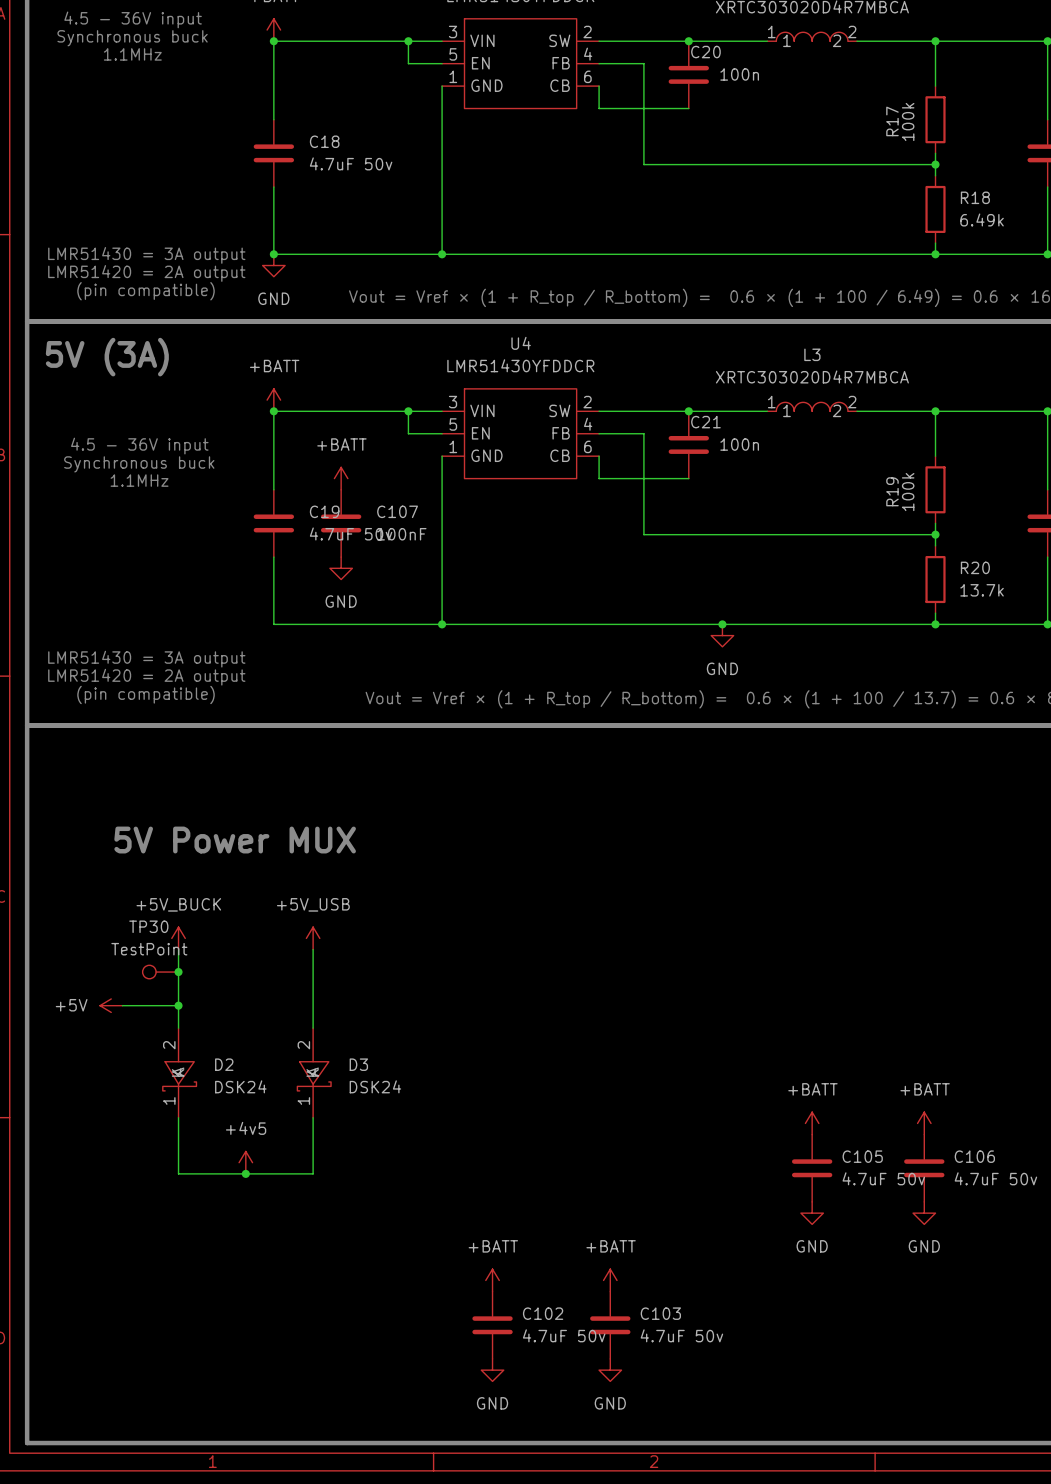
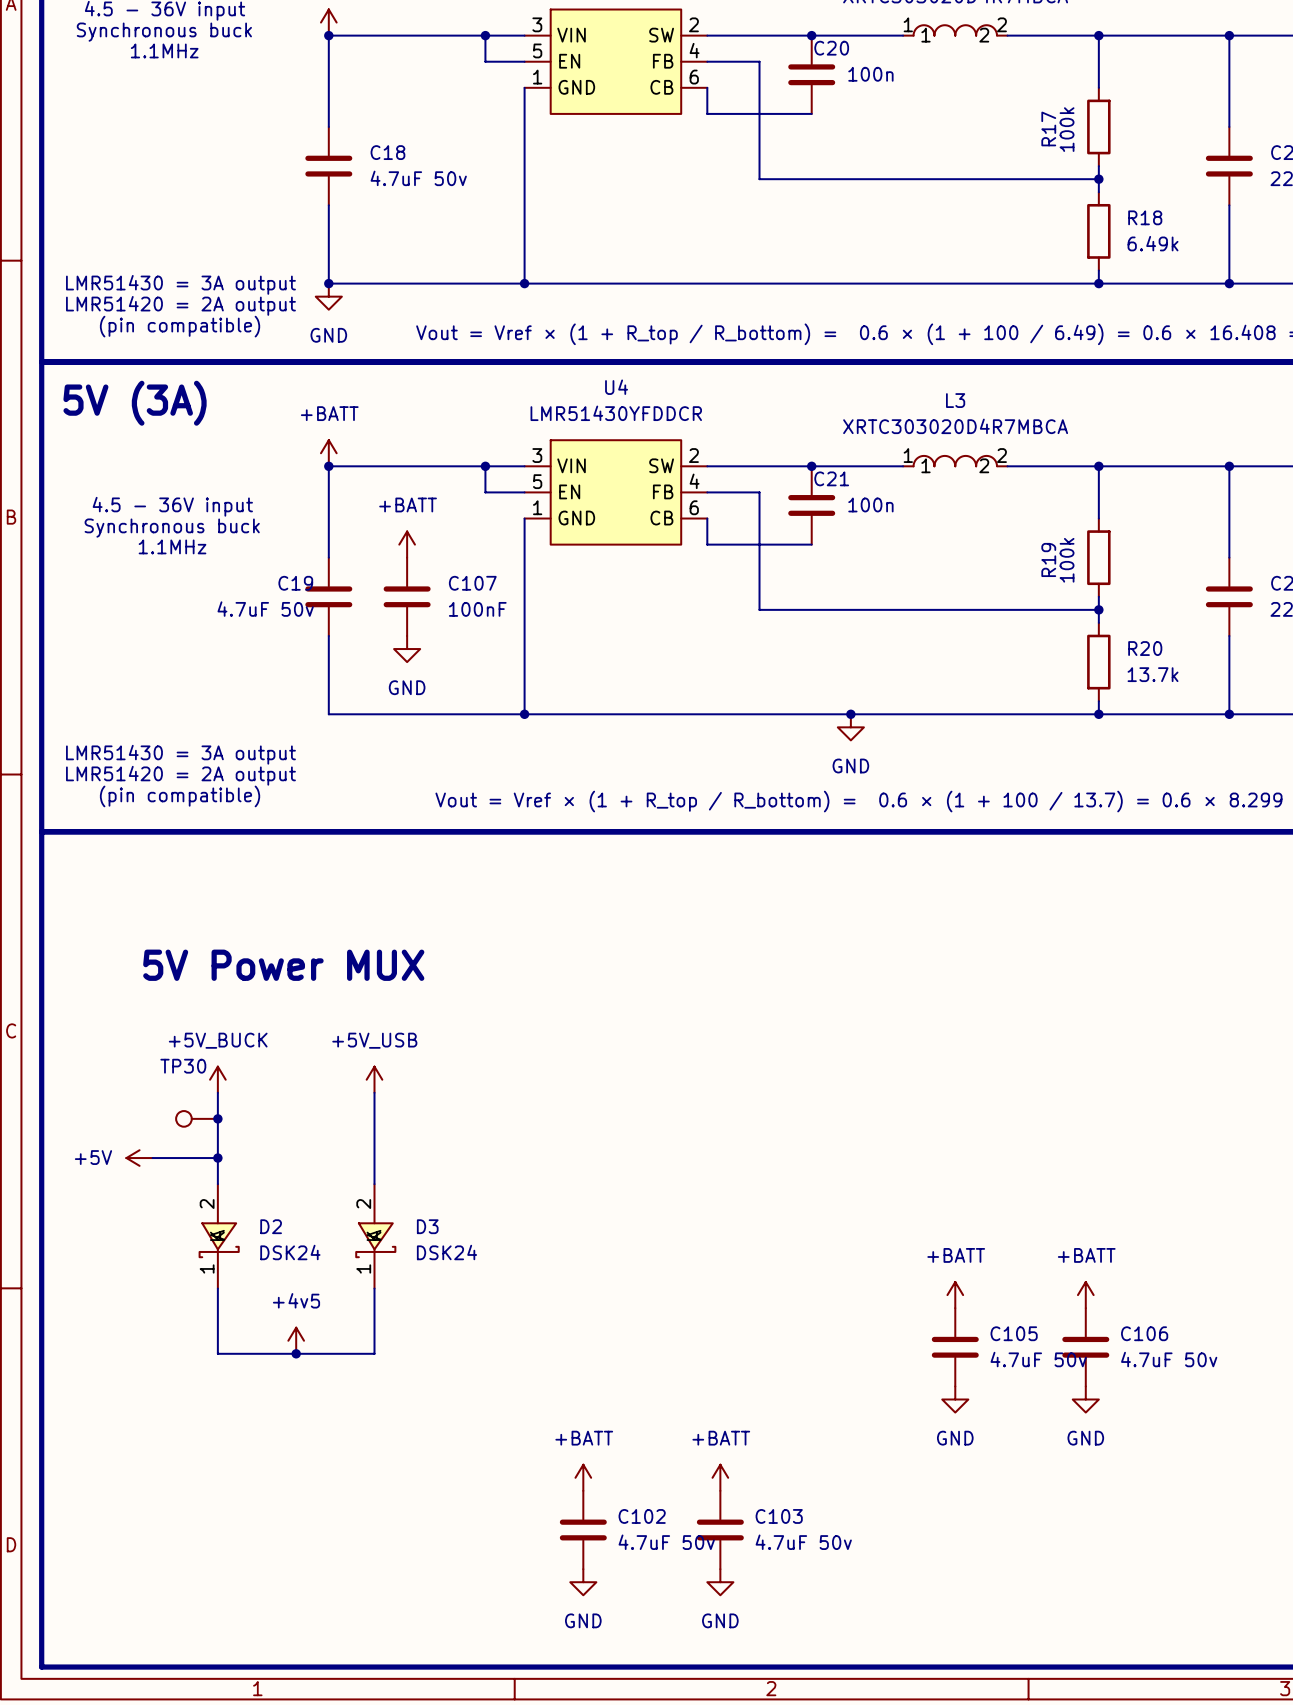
C19 name position: C19 (324, 511) -> C19 (295, 583)
C19 value position: 4.7uF 50v (351, 533) -> 4.7uF 50v (265, 609)
TP30 value: TestPoint (149, 949) -> none

